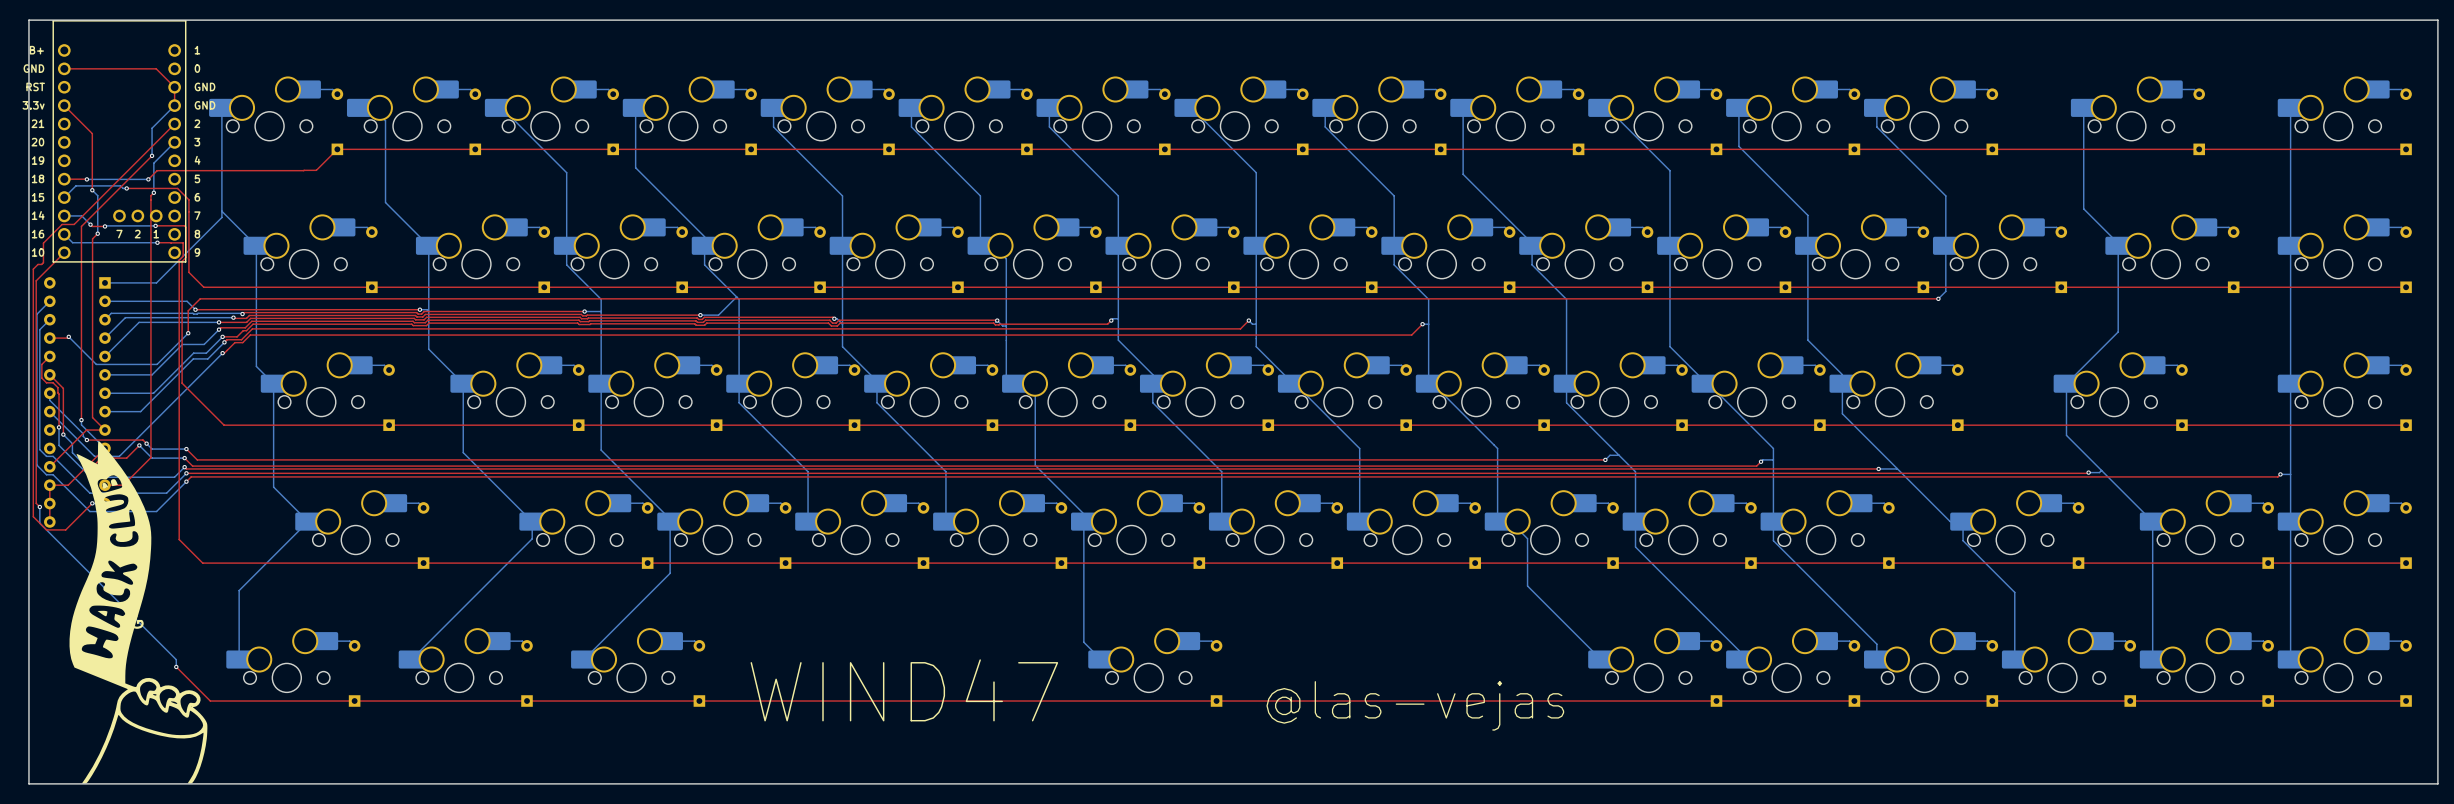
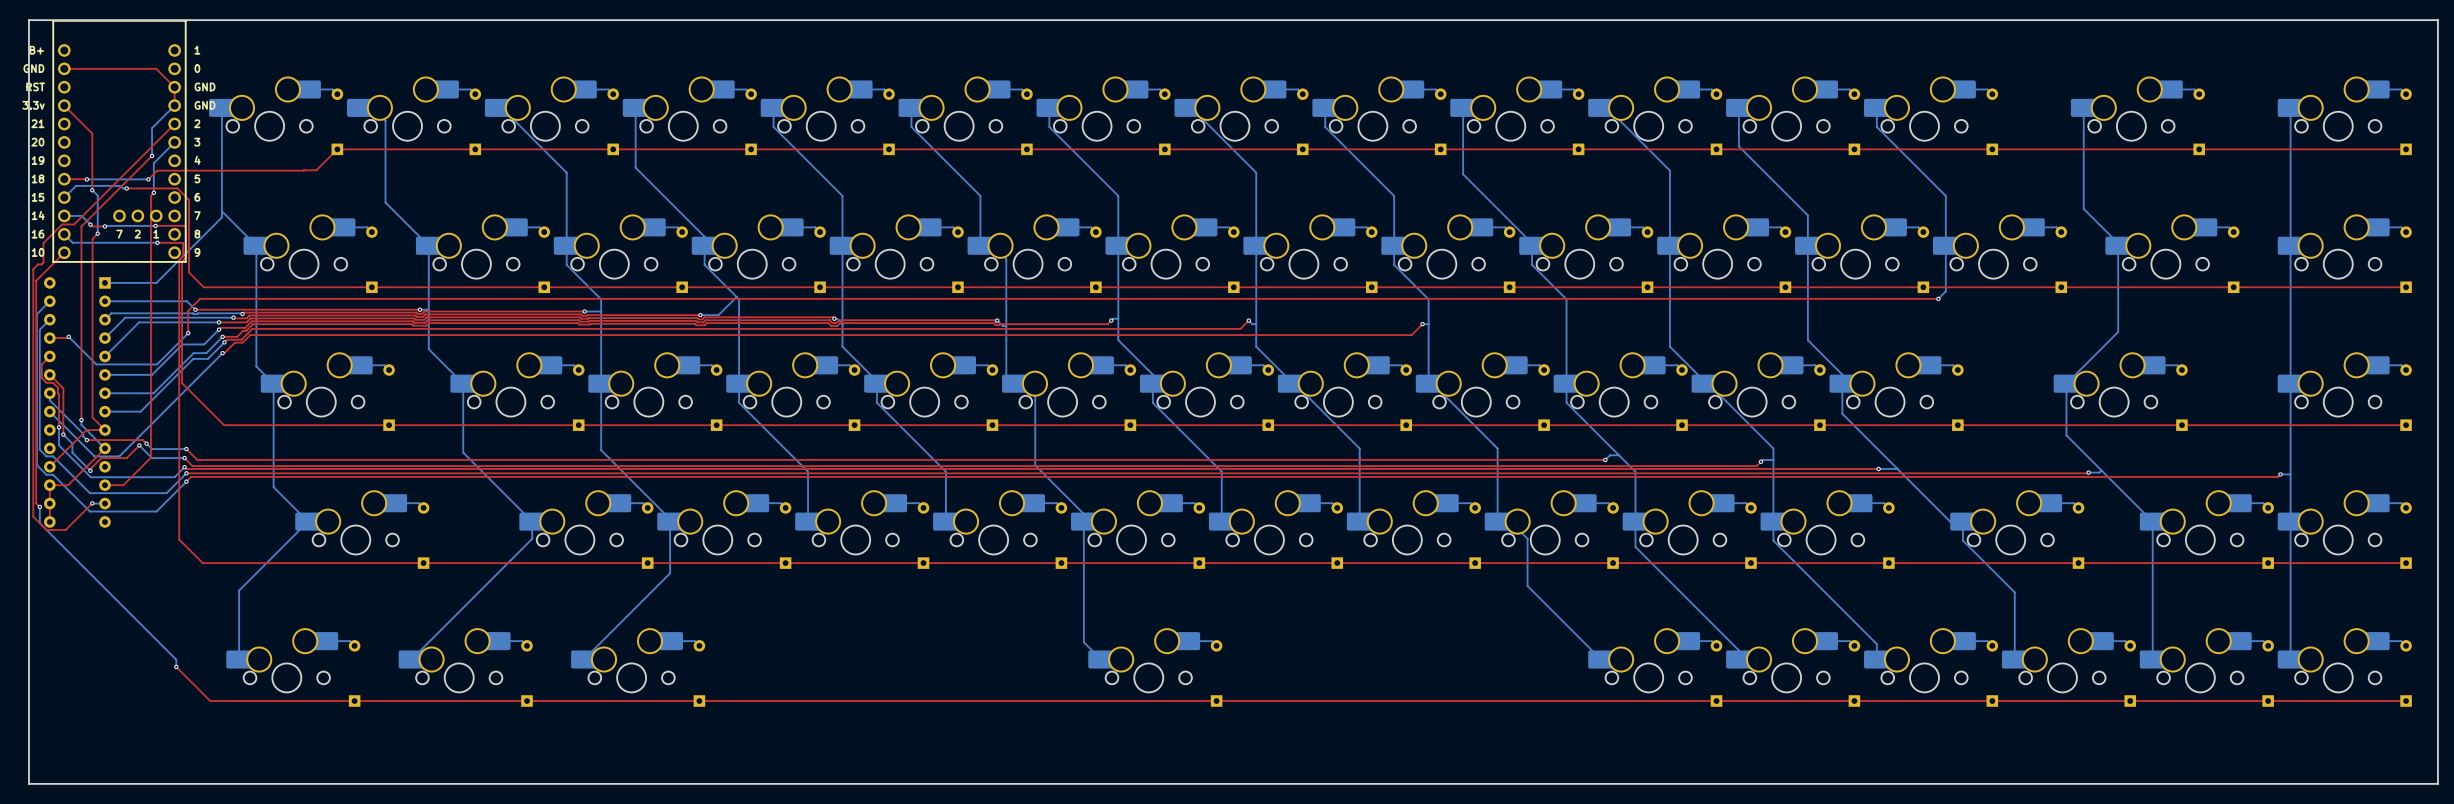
part: (138, 612) -> none
text: WIND47 (904, 690) -> none
text: @las-vejas (1415, 705) -> none

